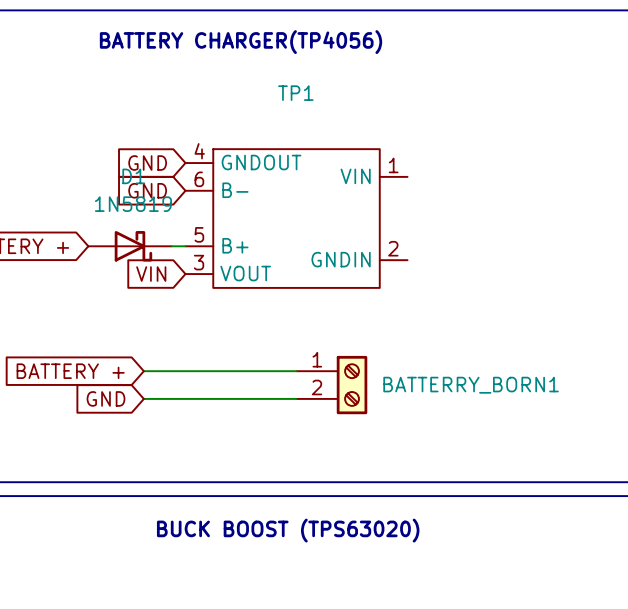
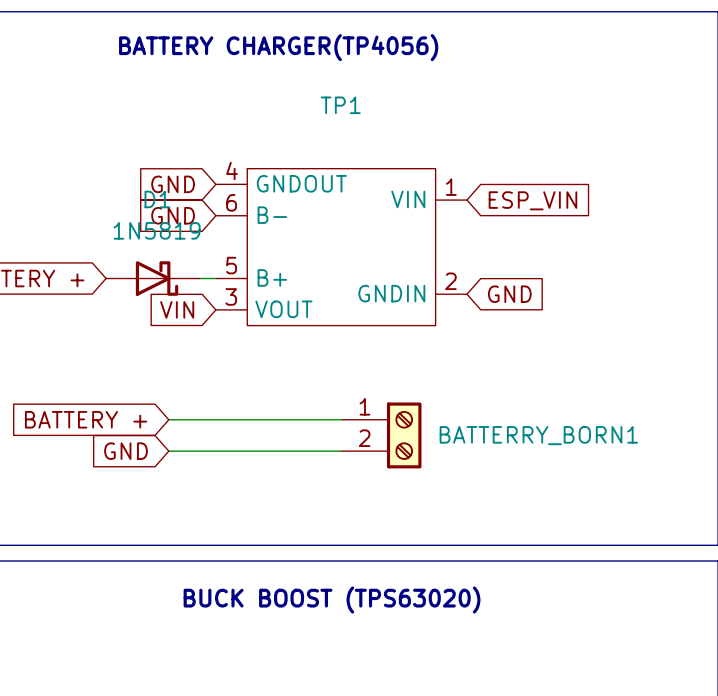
global label: none -> ESP_VIN (532, 200)
global label: none -> GND (509, 294)

